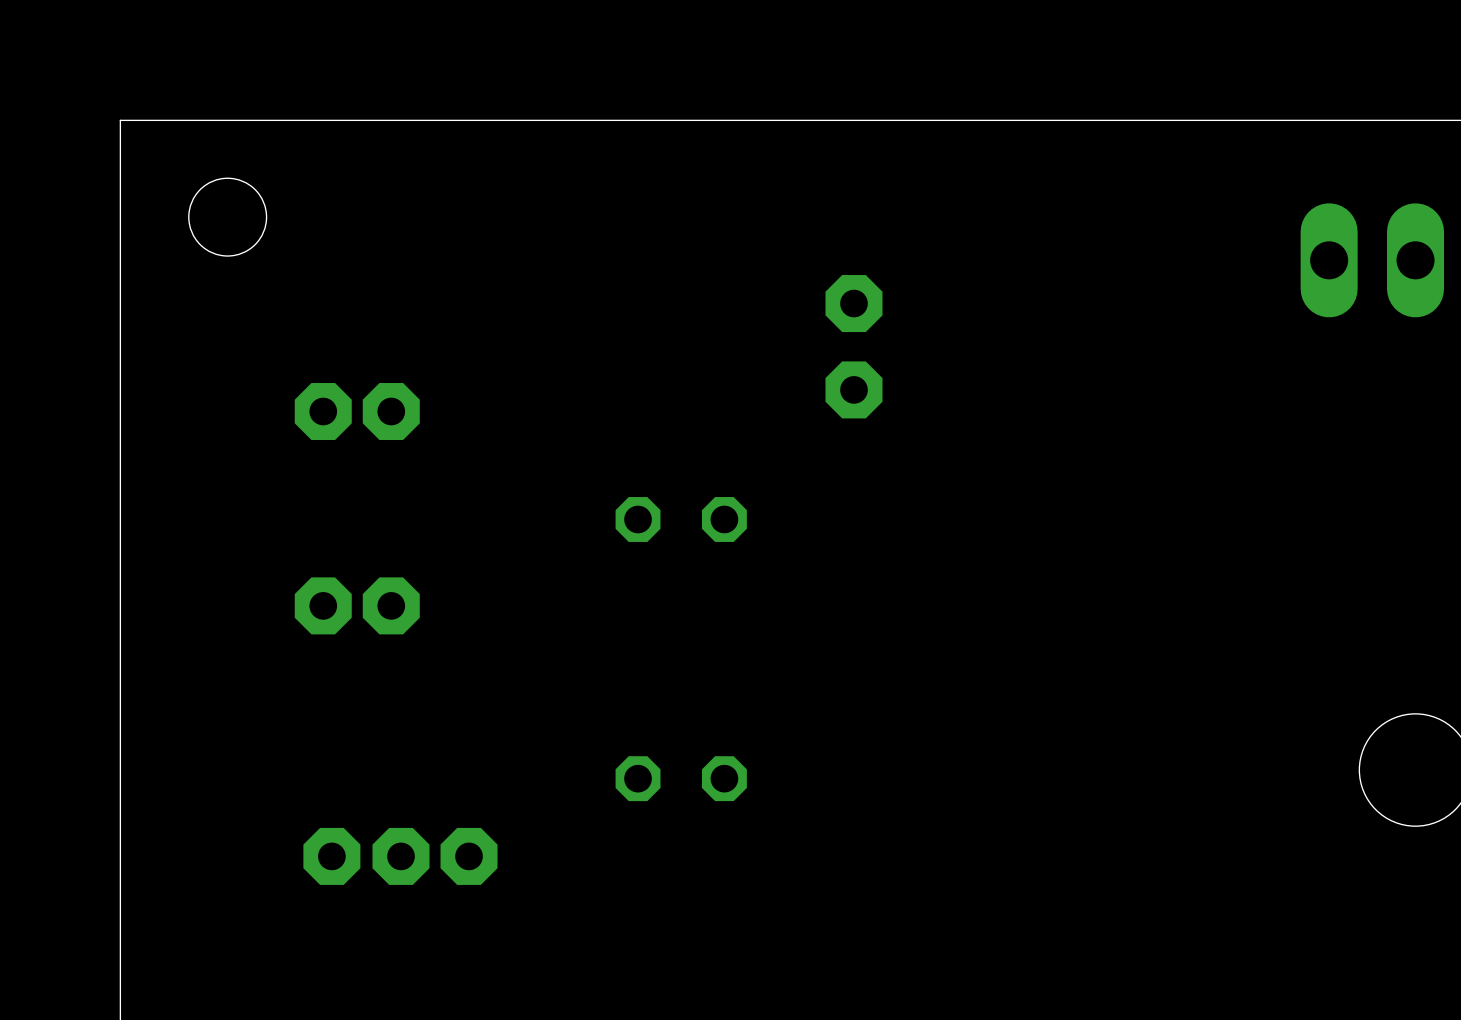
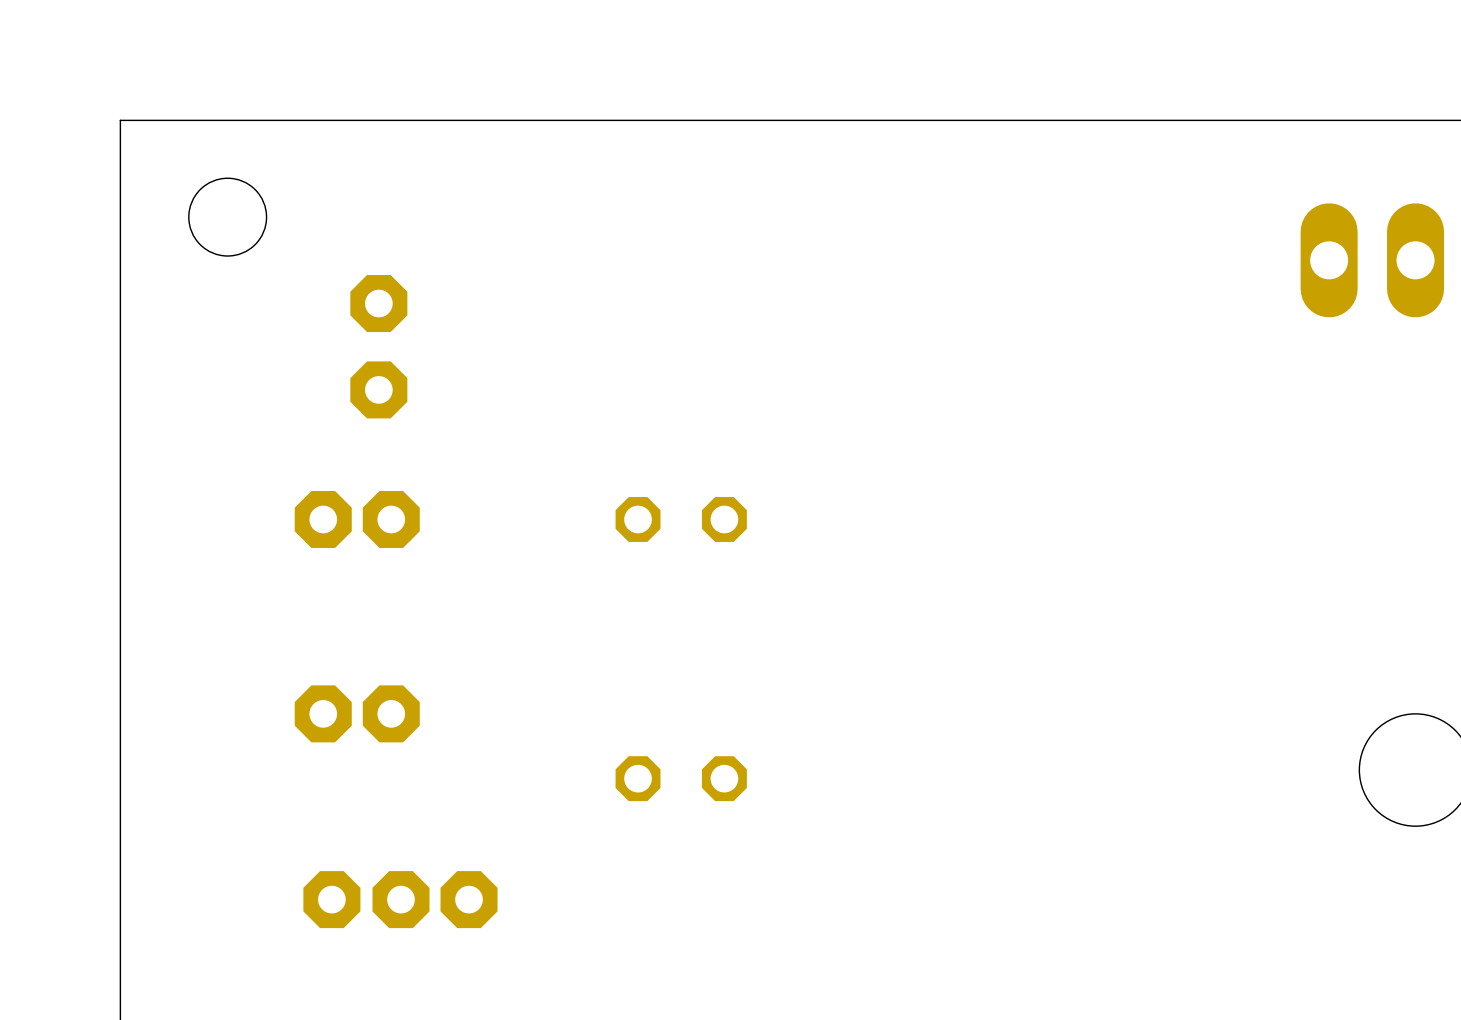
part position: (854, 346) -> (378, 346)
part: (357, 411) -> none
part: none -> (357, 519)
part: (357, 605) -> none
part: none -> (357, 713)
part position: (400, 856) -> (400, 899)

